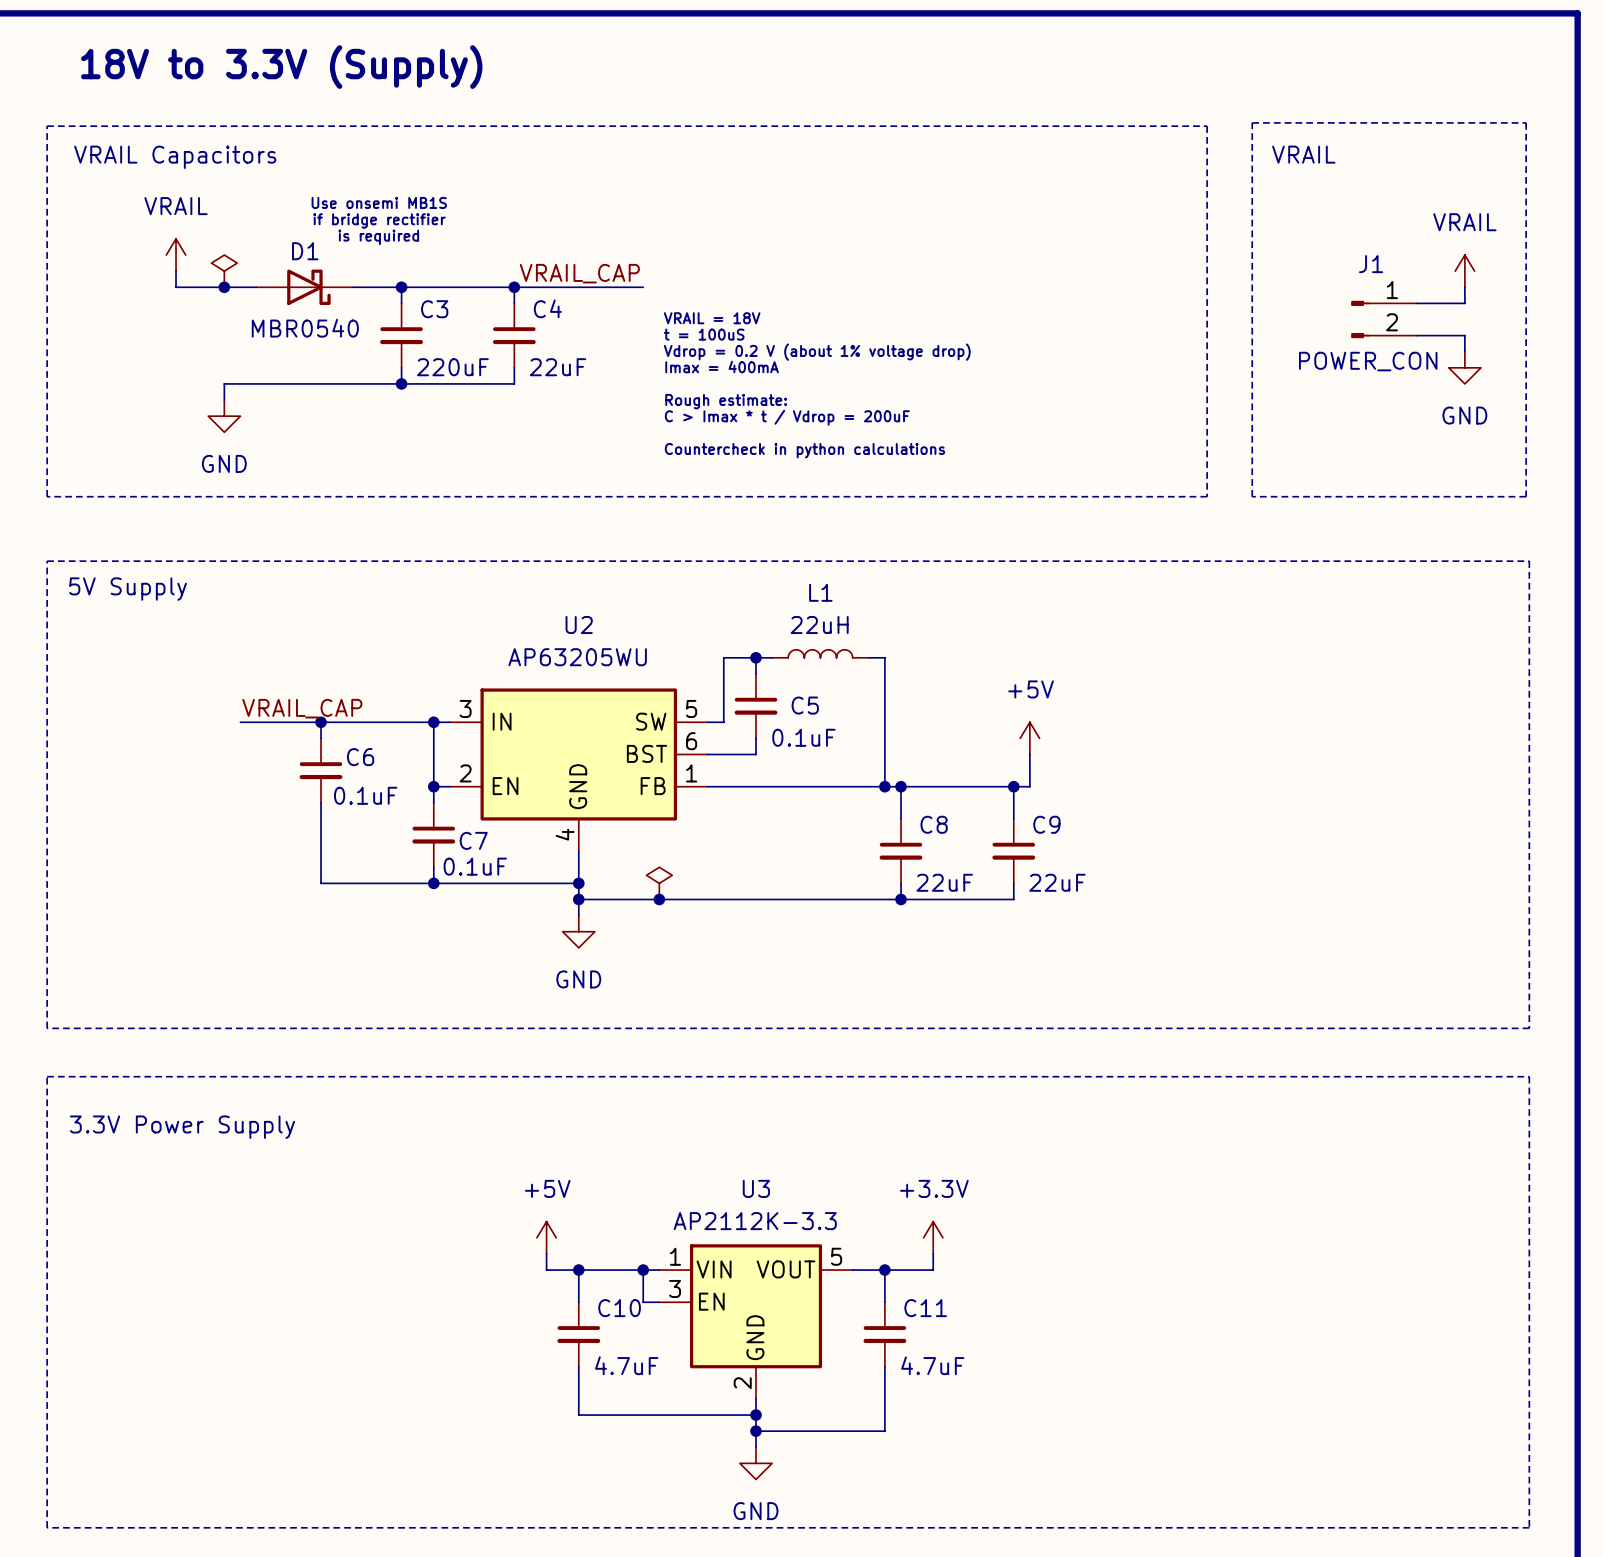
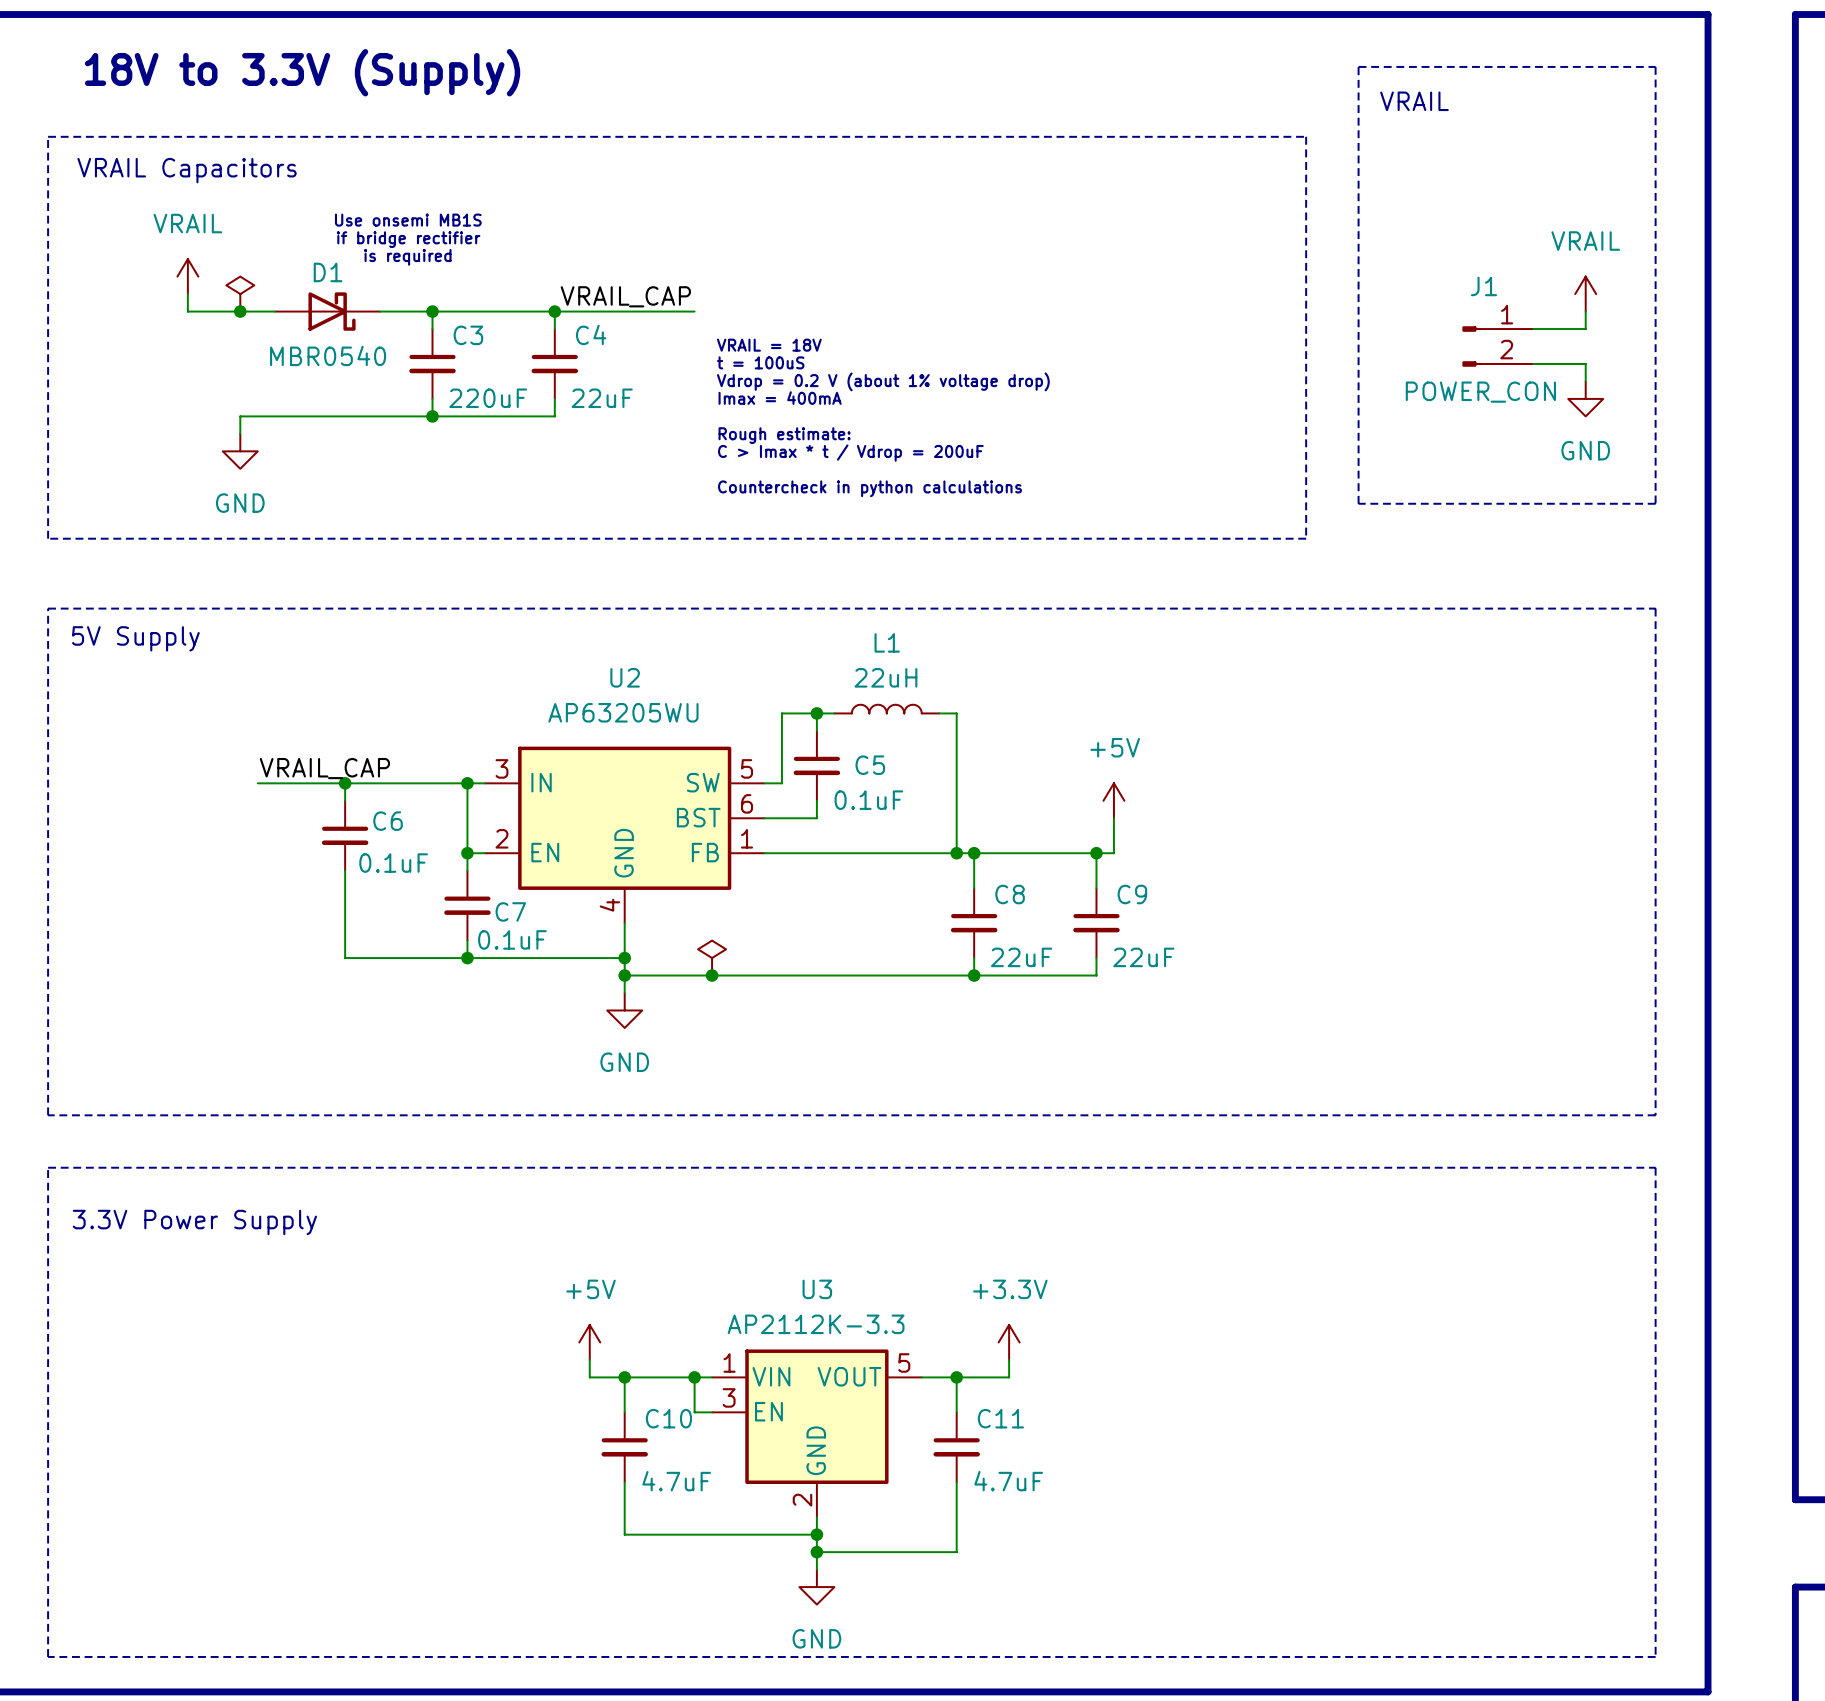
line: (1252, 122) (1526, 122) (1526, 496) (1252, 496) (1252, 122) -> (1358, 66) (1358, 503) (1655, 503) (1655, 66) (1358, 66)
text position: VRAIL (1303, 154) -> VRAIL (1414, 101)

